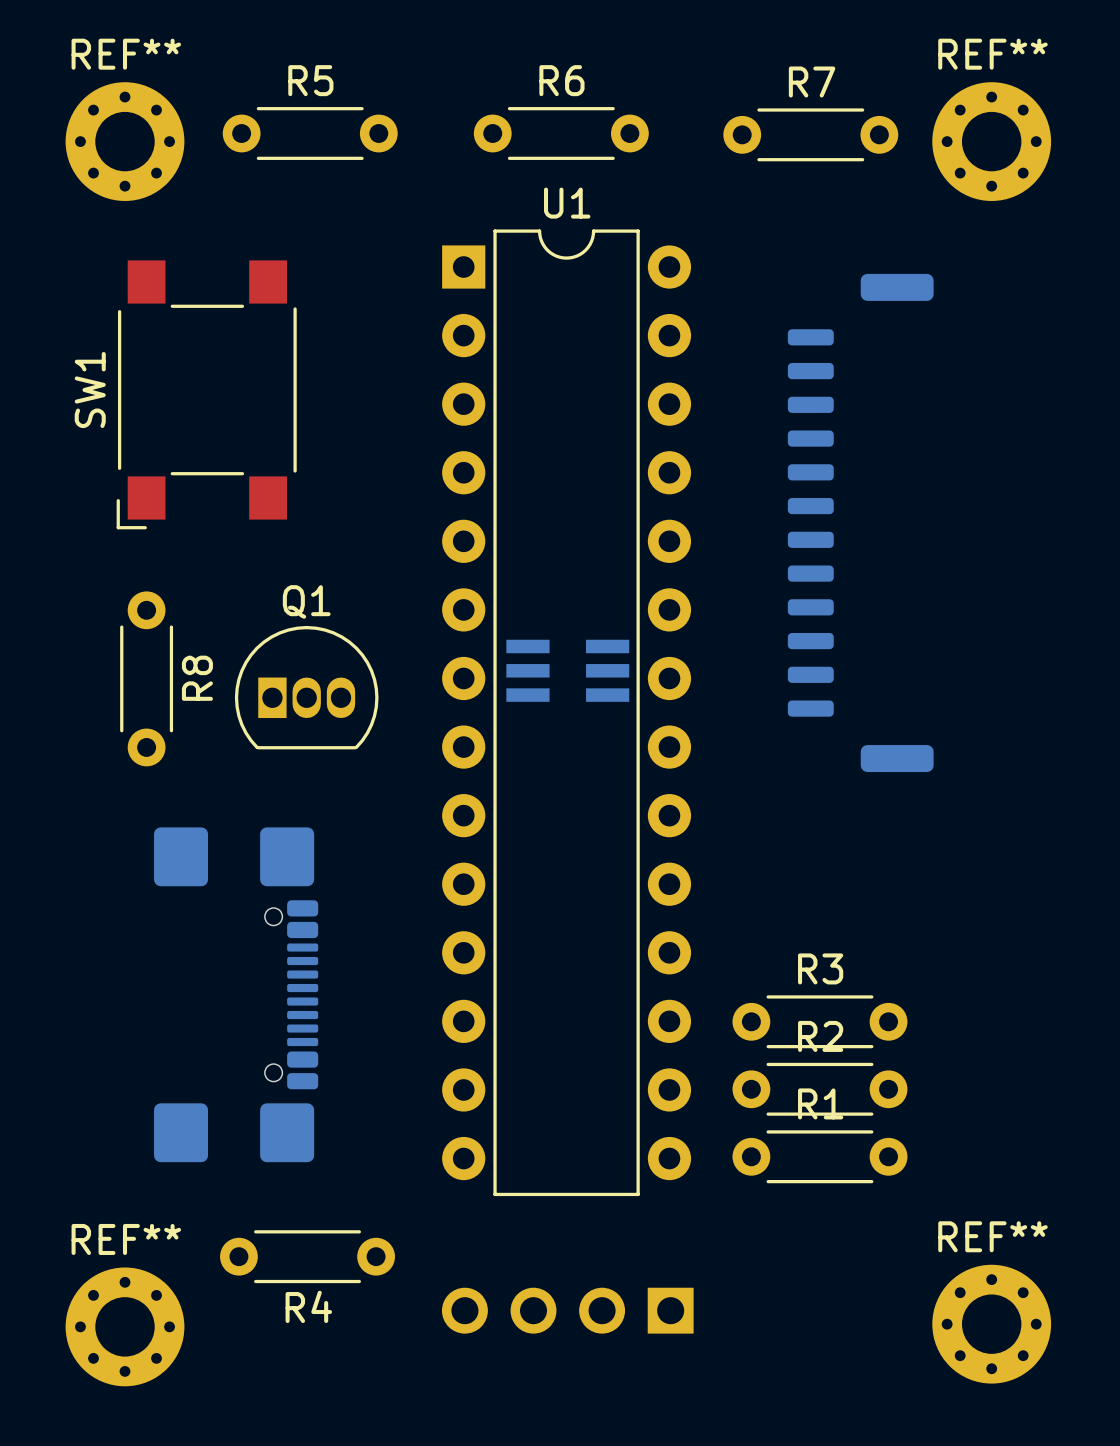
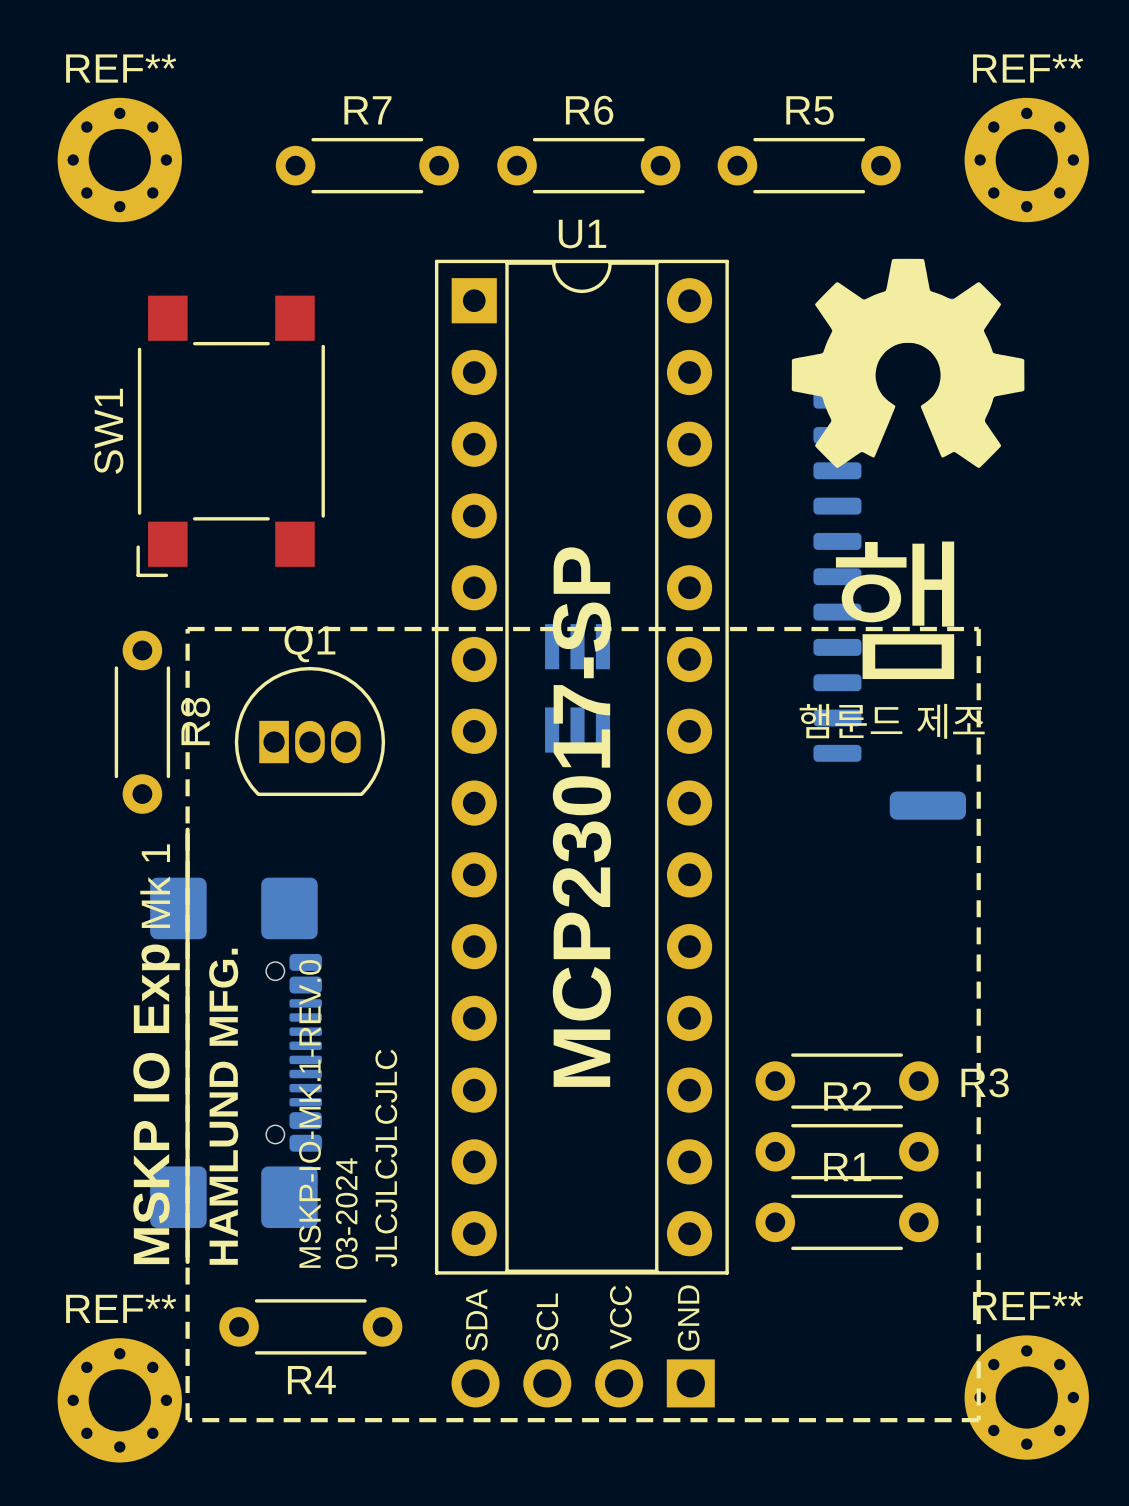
R5 position: (310, 133) -> (809, 165)
R6 position: (561, 133) -> (588, 165)
R7 position: (810, 134) -> (367, 165)
U1 footprint: [442, 229, 692, 1197] -> [434, 259, 729, 1275]
drawing: none -> [791, 258, 1025, 469]
SW1 position: (206, 394) -> (230, 436)
text: none -> 햄 (895, 610)
line: none -> (187, 629) (978, 629) (978, 1420) (187, 1420) (187, 629)
part rotation: 0° (567, 670) -> 90° clockwise (577, 688)
text: none -> 햄룬드 제조 (892, 721)
text: none -> MCP23017-SP (581, 817)
line: none -> (187, 829) (187, 1261)
text: none -> Mk 1 (155, 886)
R3 name position: R3 (820, 968) -> R3 (985, 1082)
text: none -> MSKP-IO-MK.1-REV.0 (310, 1113)
text: none -> MSKP IO Exp (156, 1104)
text: none -> HAMLUND MFG. (223, 1106)
text: none -> JLCJLCJLCJLC (386, 1158)
text: none -> 03-2024 (346, 1213)
text: none -> VCC (620, 1317)
text: none -> GND (688, 1318)
text: none -> SDA (476, 1319)
text: none -> SCL (547, 1322)

